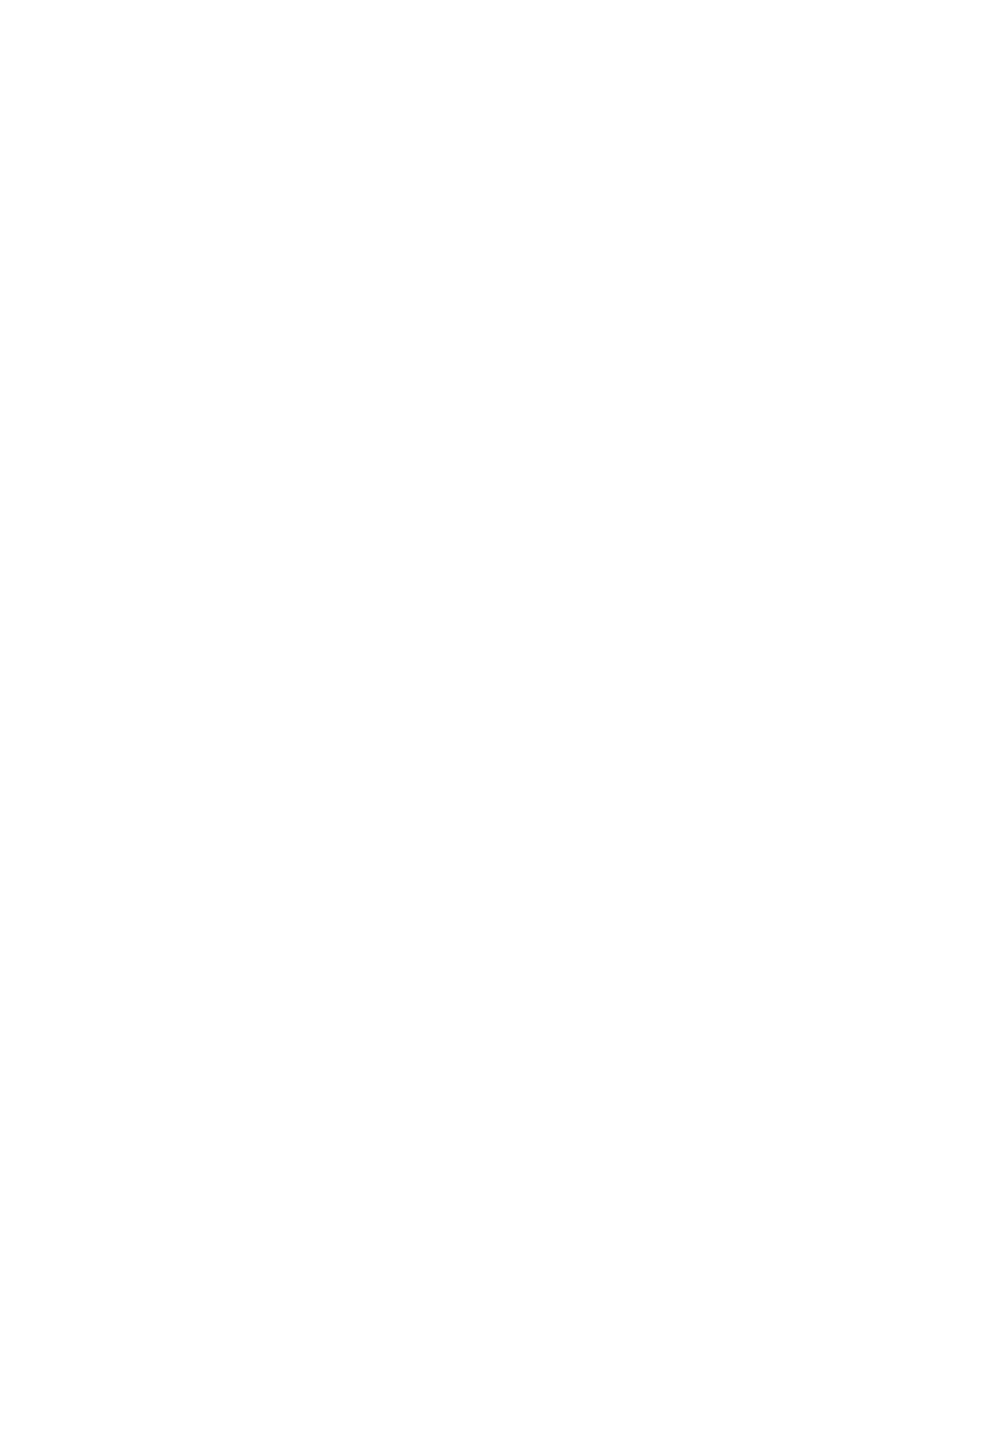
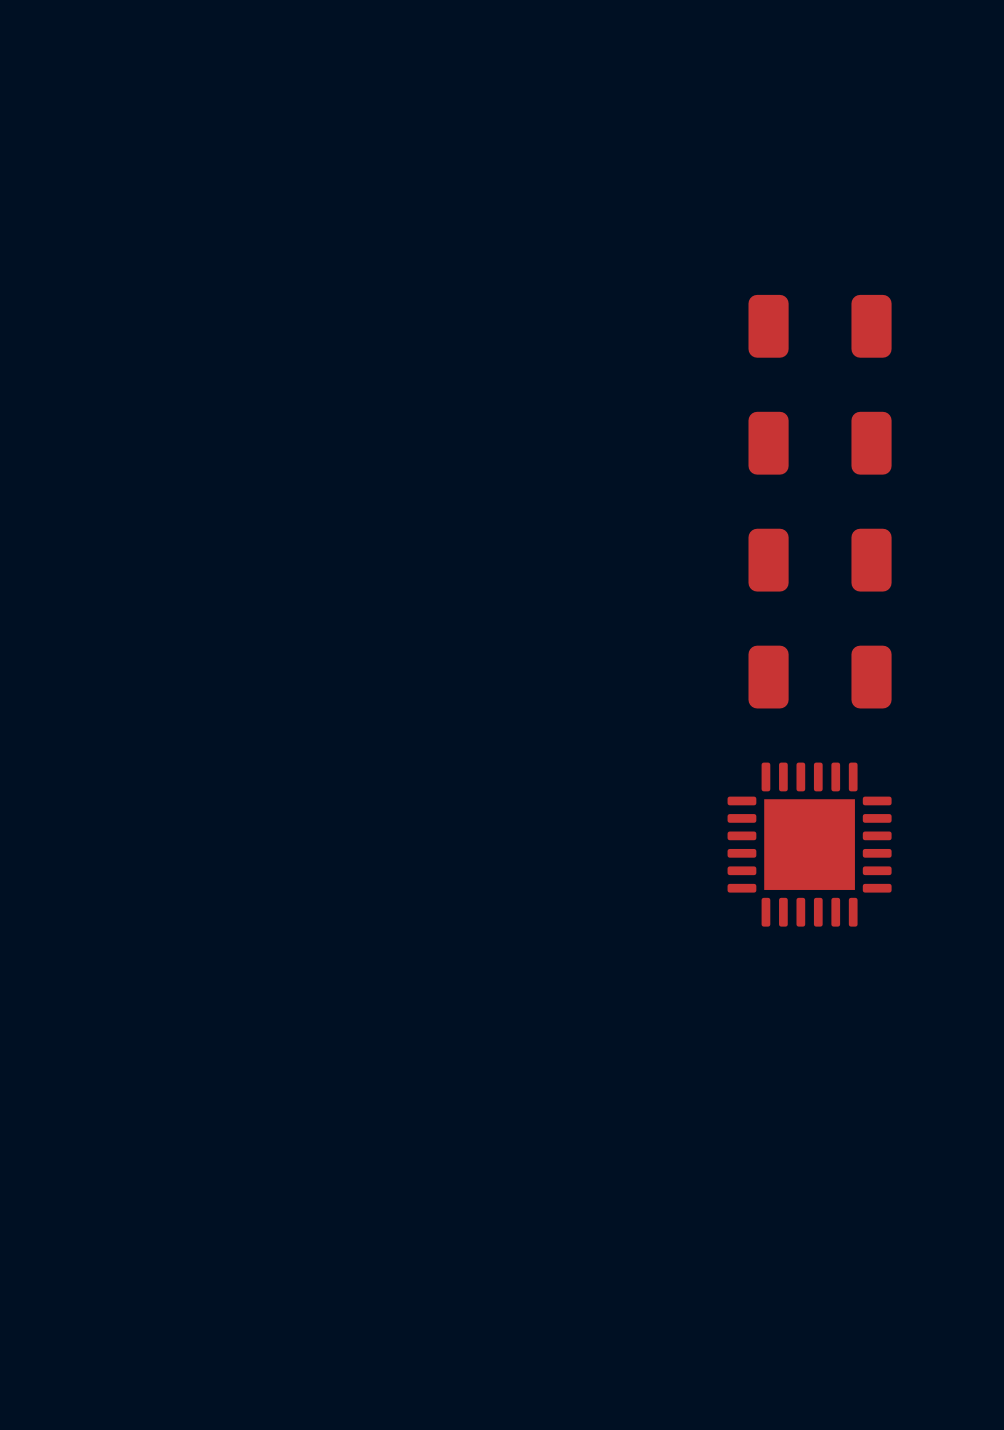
part: none -> (820, 326)
part: none -> (820, 443)
part: none -> (820, 560)
part: none -> (820, 677)
part: none -> (809, 844)

